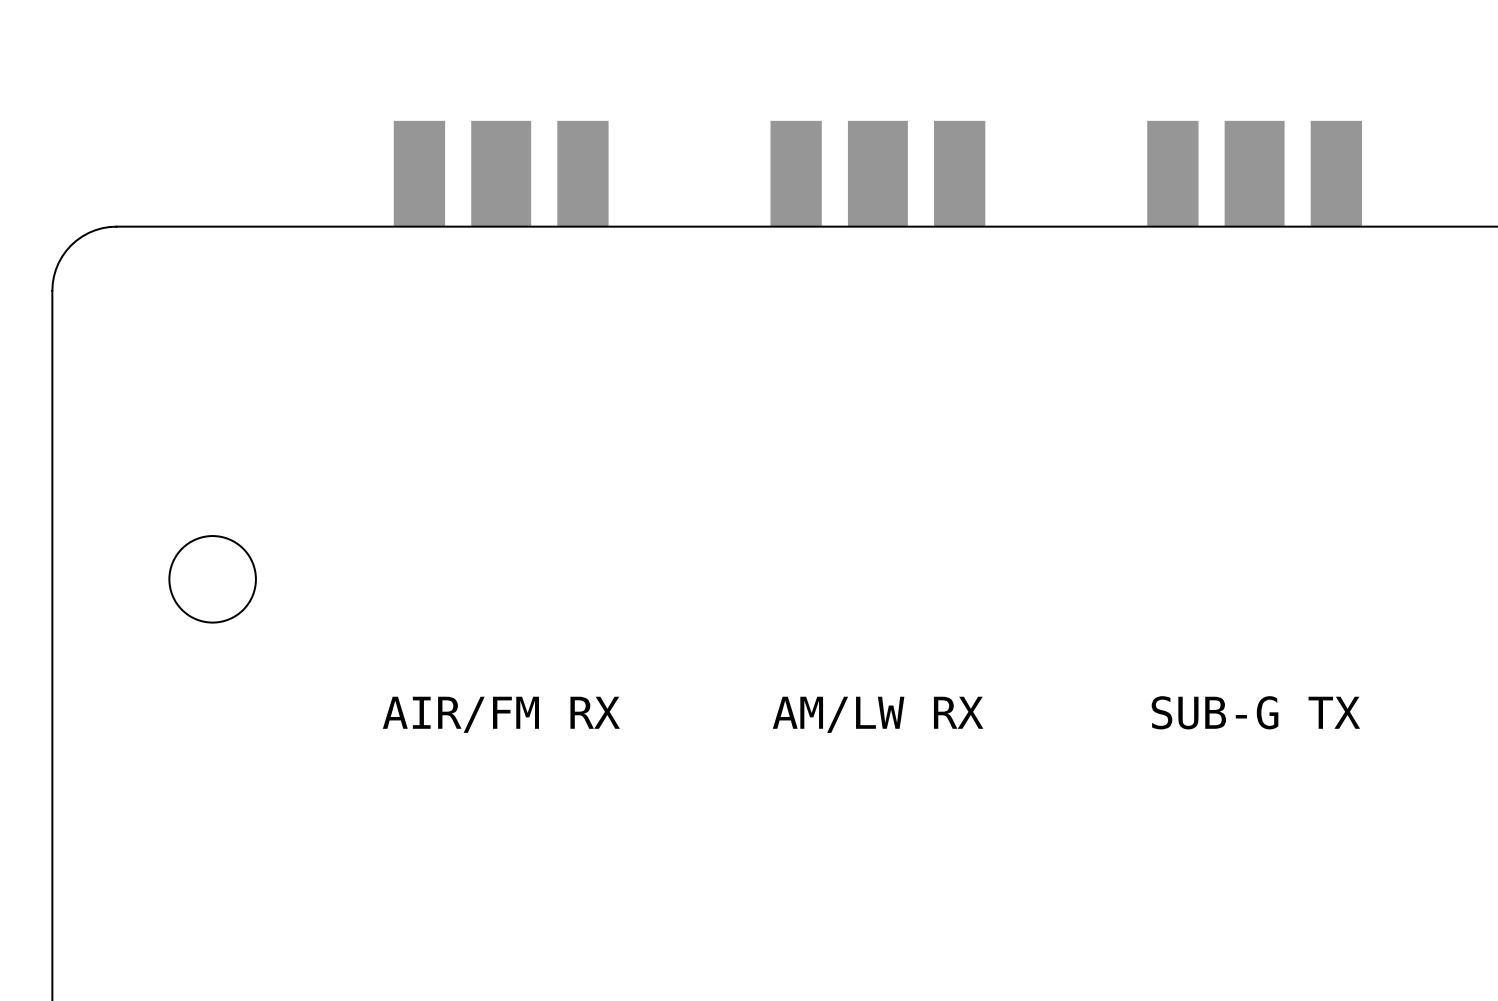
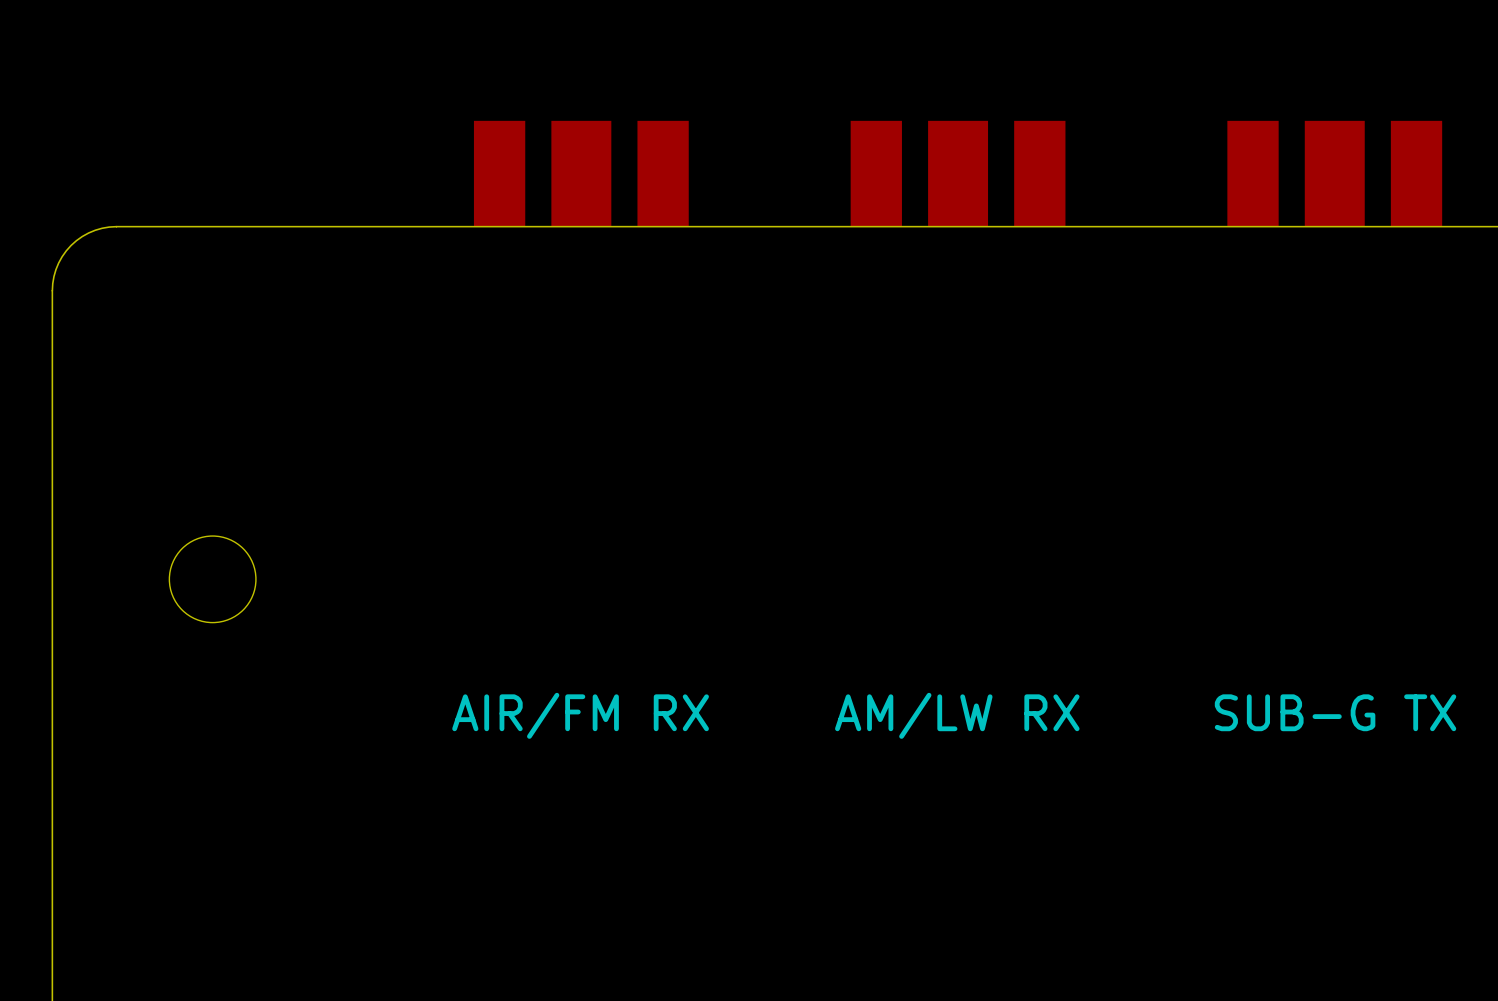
part position: (501, 173) -> (581, 173)
part position: (877, 173) -> (958, 173)
part position: (1254, 173) -> (1334, 173)
text position: SUB-G TX (1255, 712) -> SUB-G TX (1335, 712)
text position: AIR/FM RX (501, 714) -> AIR/FM RX (580, 715)
text position: AM/LW RX (878, 714) -> AM/LW RX (957, 715)

